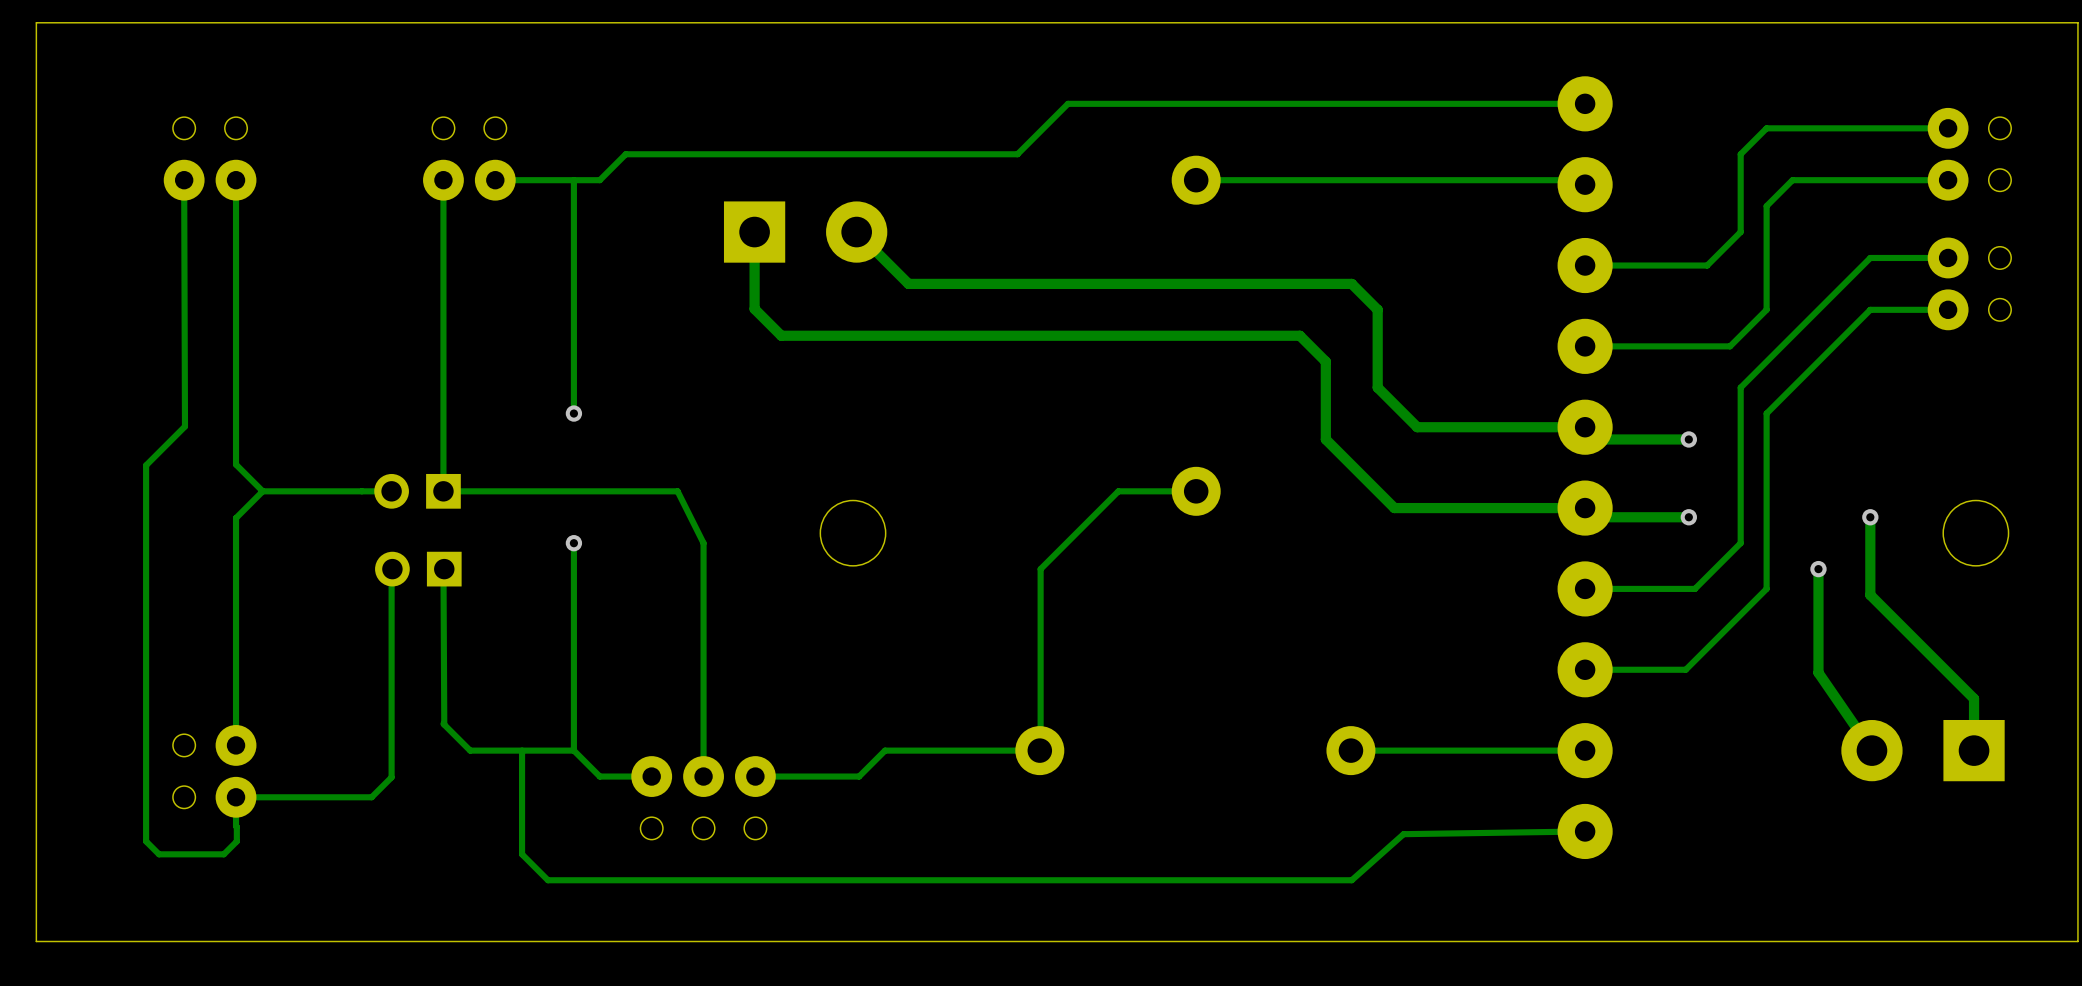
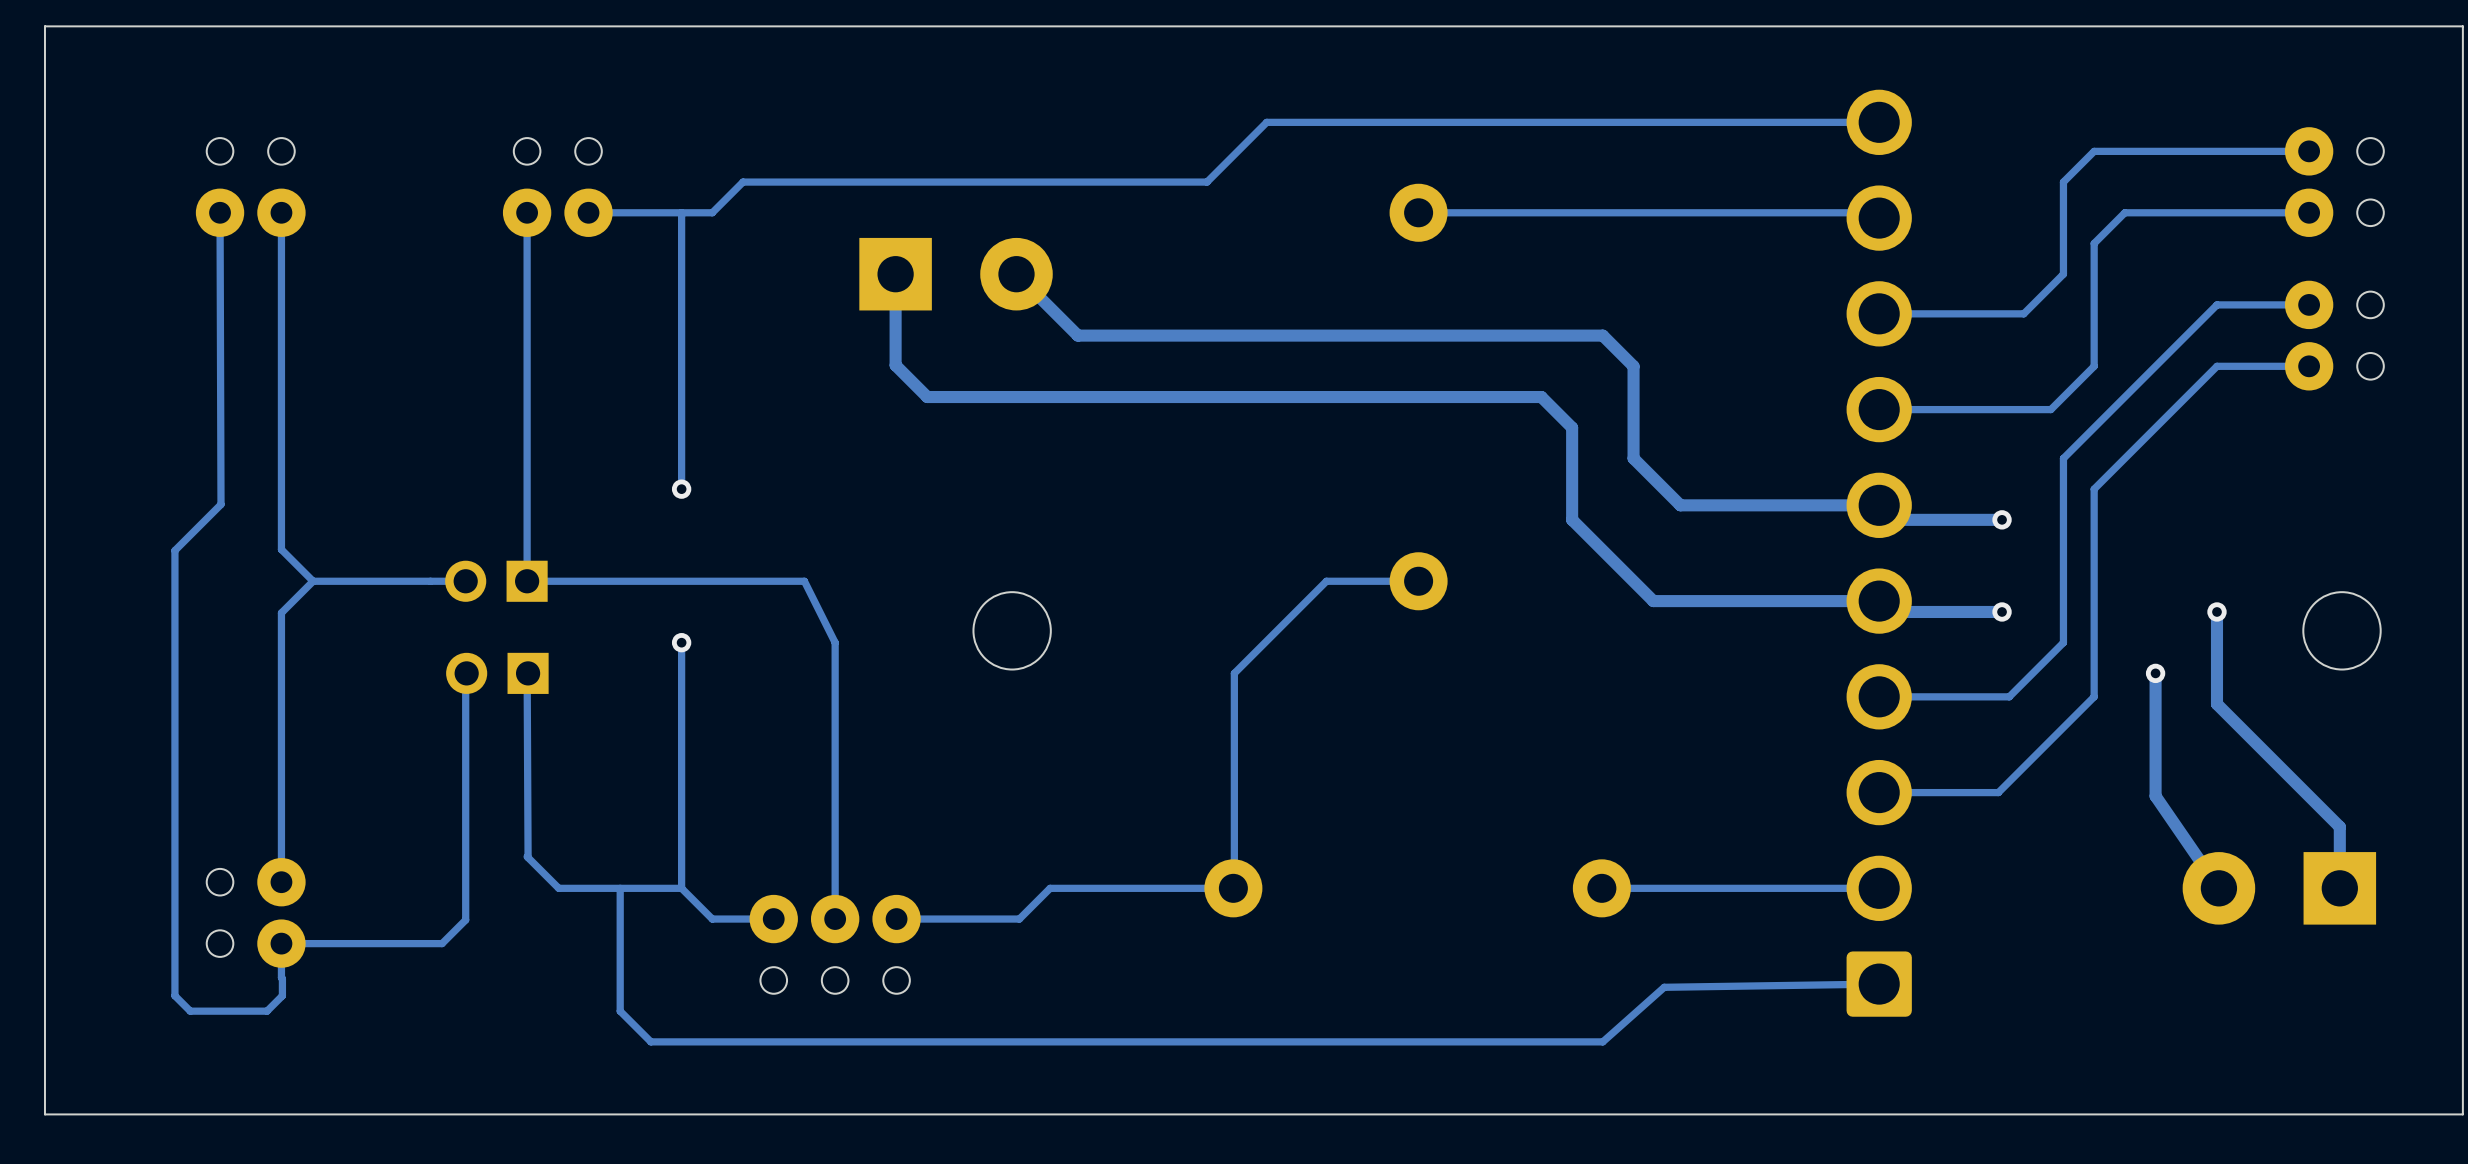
part footprint: [1557, 76, 1613, 860] -> [1846, 89, 1912, 1017]

